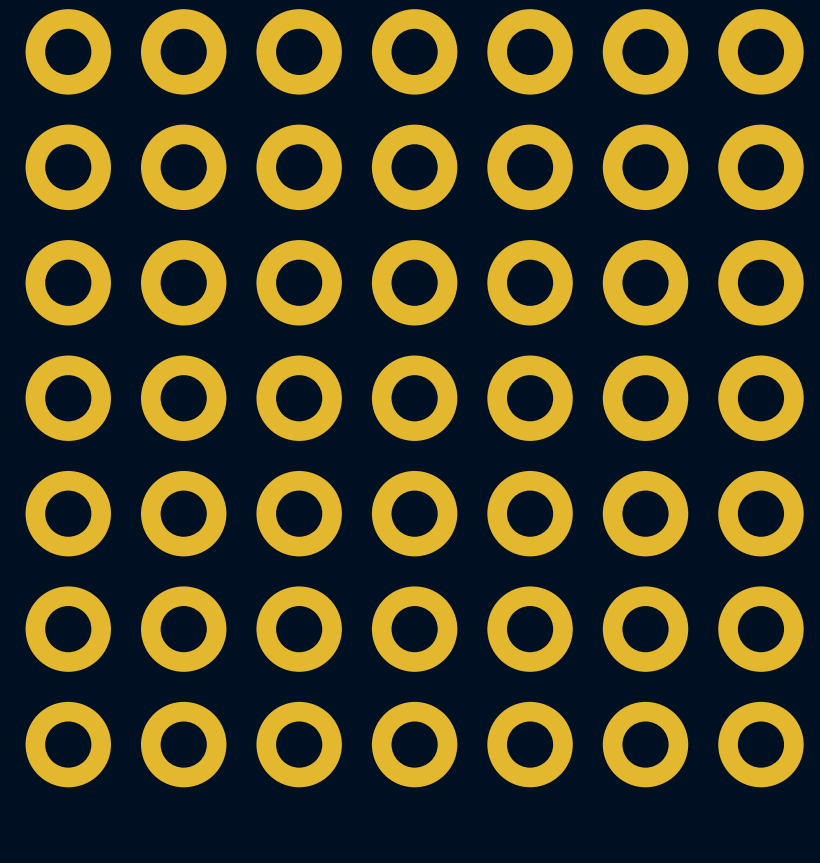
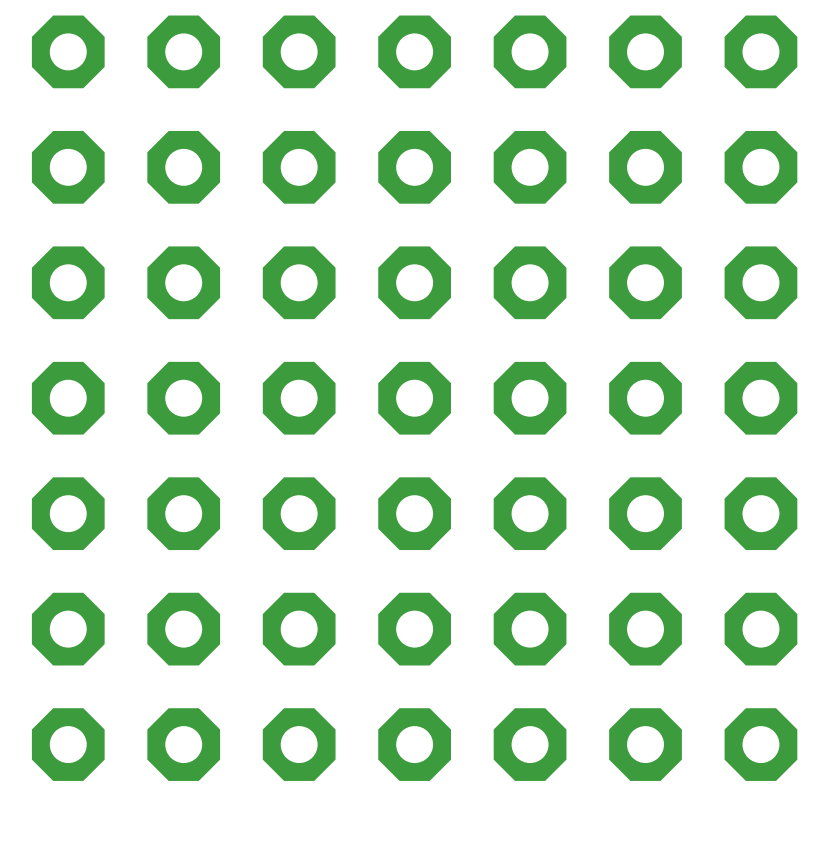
part footprint: [25, 9, 111, 788] -> [31, 361, 105, 435]
part footprint: [141, 9, 227, 788] -> [147, 361, 221, 435]
part footprint: [256, 9, 342, 788] -> [262, 361, 336, 435]
part footprint: [371, 9, 458, 788] -> [378, 361, 451, 435]
part footprint: [487, 9, 573, 788] -> [493, 361, 567, 435]
part footprint: [602, 9, 689, 788] -> [609, 361, 682, 435]
part footprint: [718, 9, 804, 788] -> [724, 361, 798, 435]
part: none -> (68, 51)
part: none -> (183, 51)
part: none -> (299, 51)
part: none -> (414, 51)
part: none -> (530, 51)
part: none -> (645, 51)
part: none -> (760, 51)
part: none -> (68, 167)
part: none -> (183, 167)
part: none -> (299, 167)
part: none -> (414, 167)
part: none -> (530, 167)
part: none -> (645, 167)
part: none -> (760, 167)
part: none -> (68, 282)
part: none -> (183, 282)
part: none -> (299, 282)
part: none -> (414, 282)
part: none -> (530, 282)
part: none -> (645, 282)
part: none -> (760, 282)
part: none -> (68, 513)
part: none -> (183, 513)
part: none -> (299, 513)
part: none -> (414, 513)
part: none -> (530, 513)
part: none -> (645, 513)
part: none -> (760, 513)
part: none -> (68, 629)
part: none -> (183, 629)
part: none -> (299, 629)
part: none -> (414, 629)
part: none -> (530, 629)
part: none -> (645, 629)
part: none -> (760, 629)
part: none -> (68, 744)
part: none -> (183, 744)
part: none -> (299, 744)
part: none -> (414, 744)
part: none -> (530, 744)
part: none -> (645, 744)
part: none -> (760, 744)

